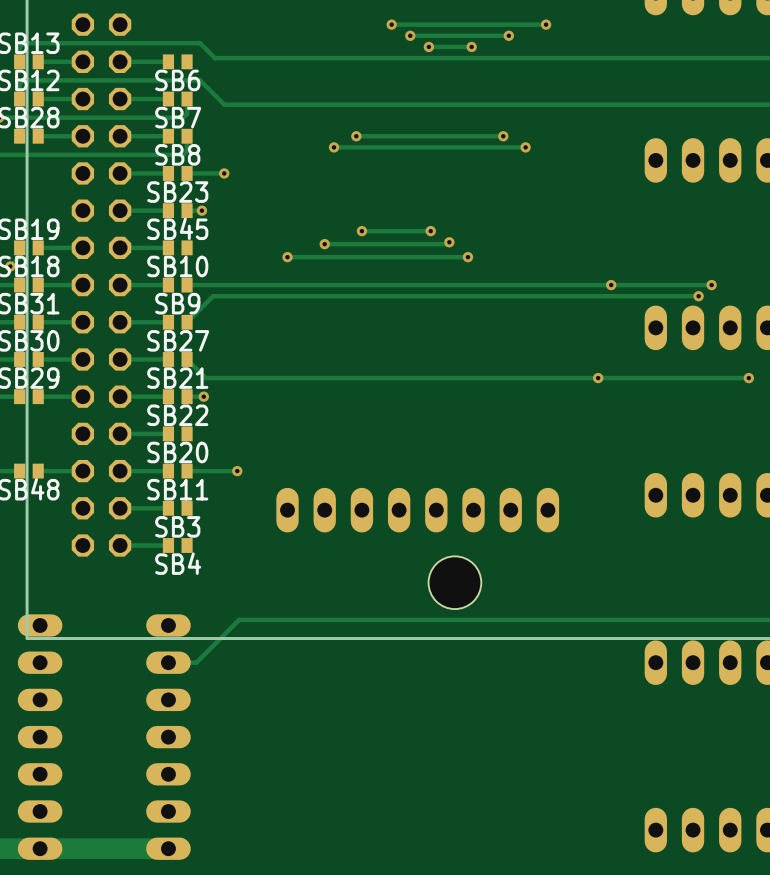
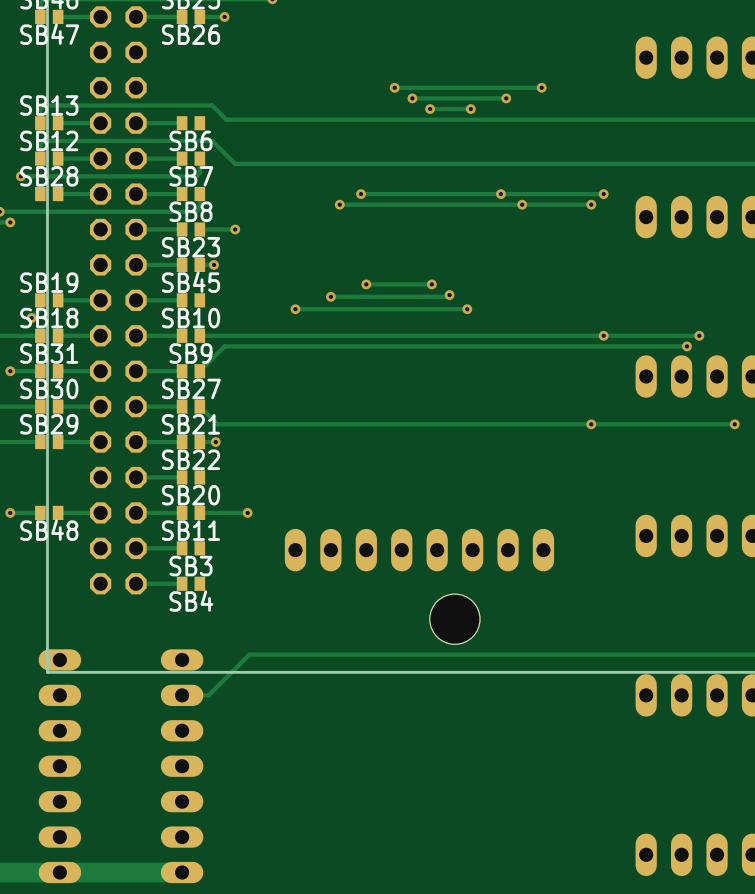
track: none -> (603, 194) (500, 194)
via: none -> (603, 194)
track: none -> (591, 204) (522, 204)
via: none -> (591, 204)

